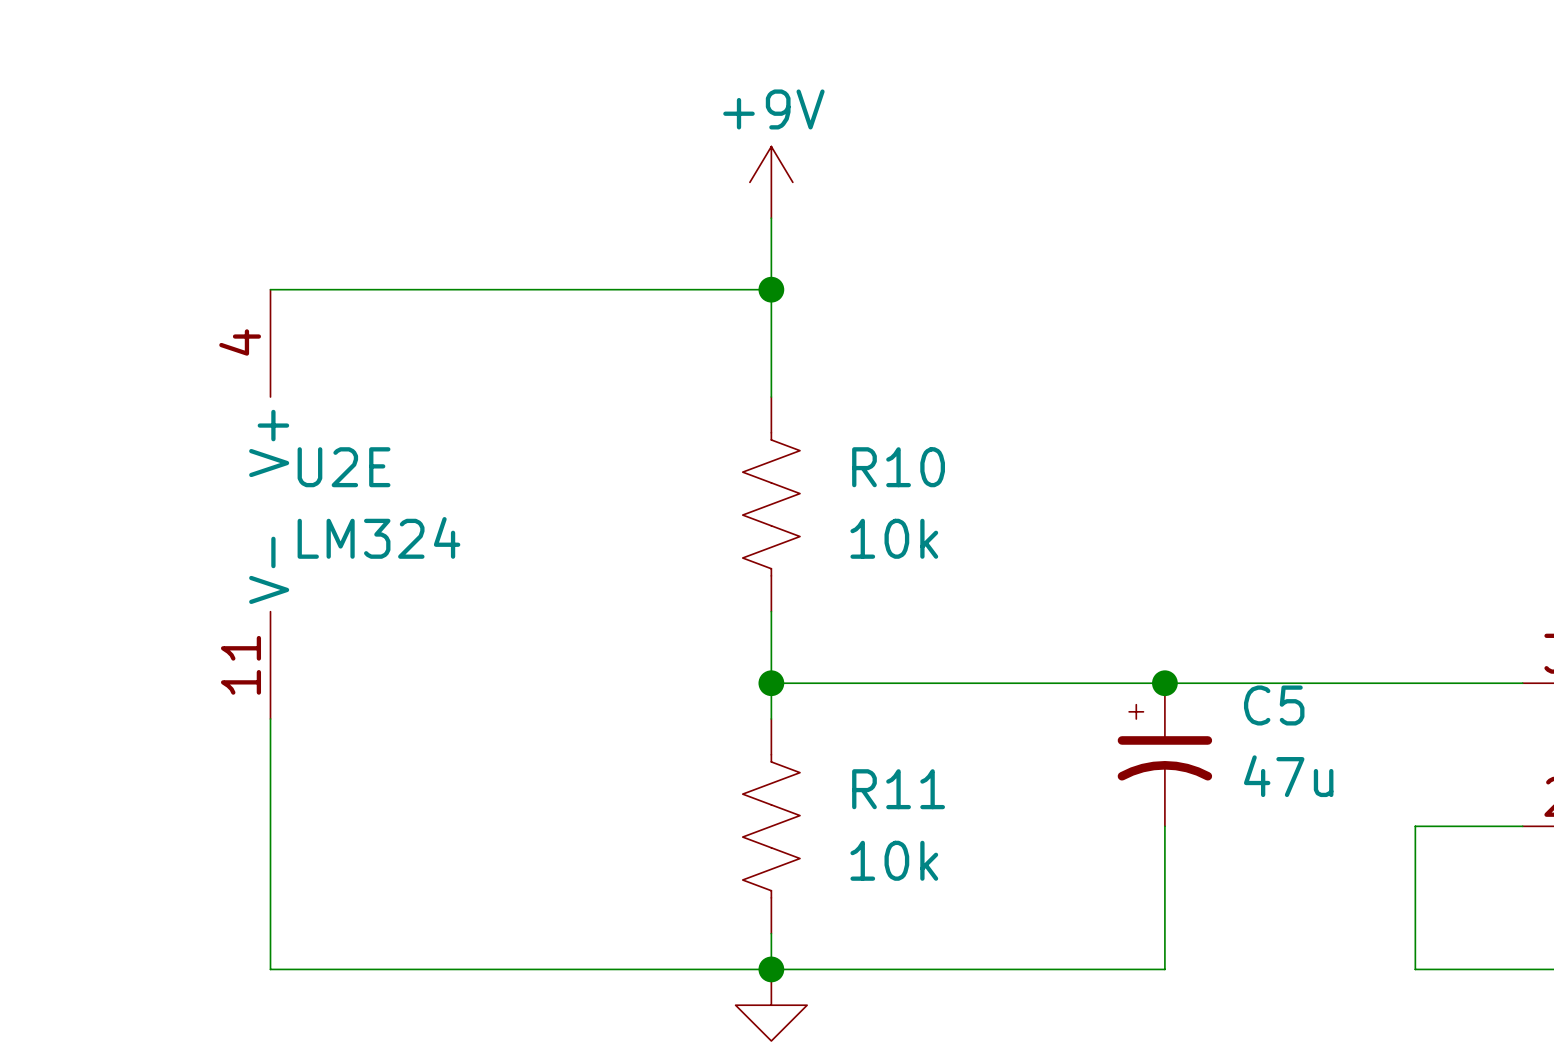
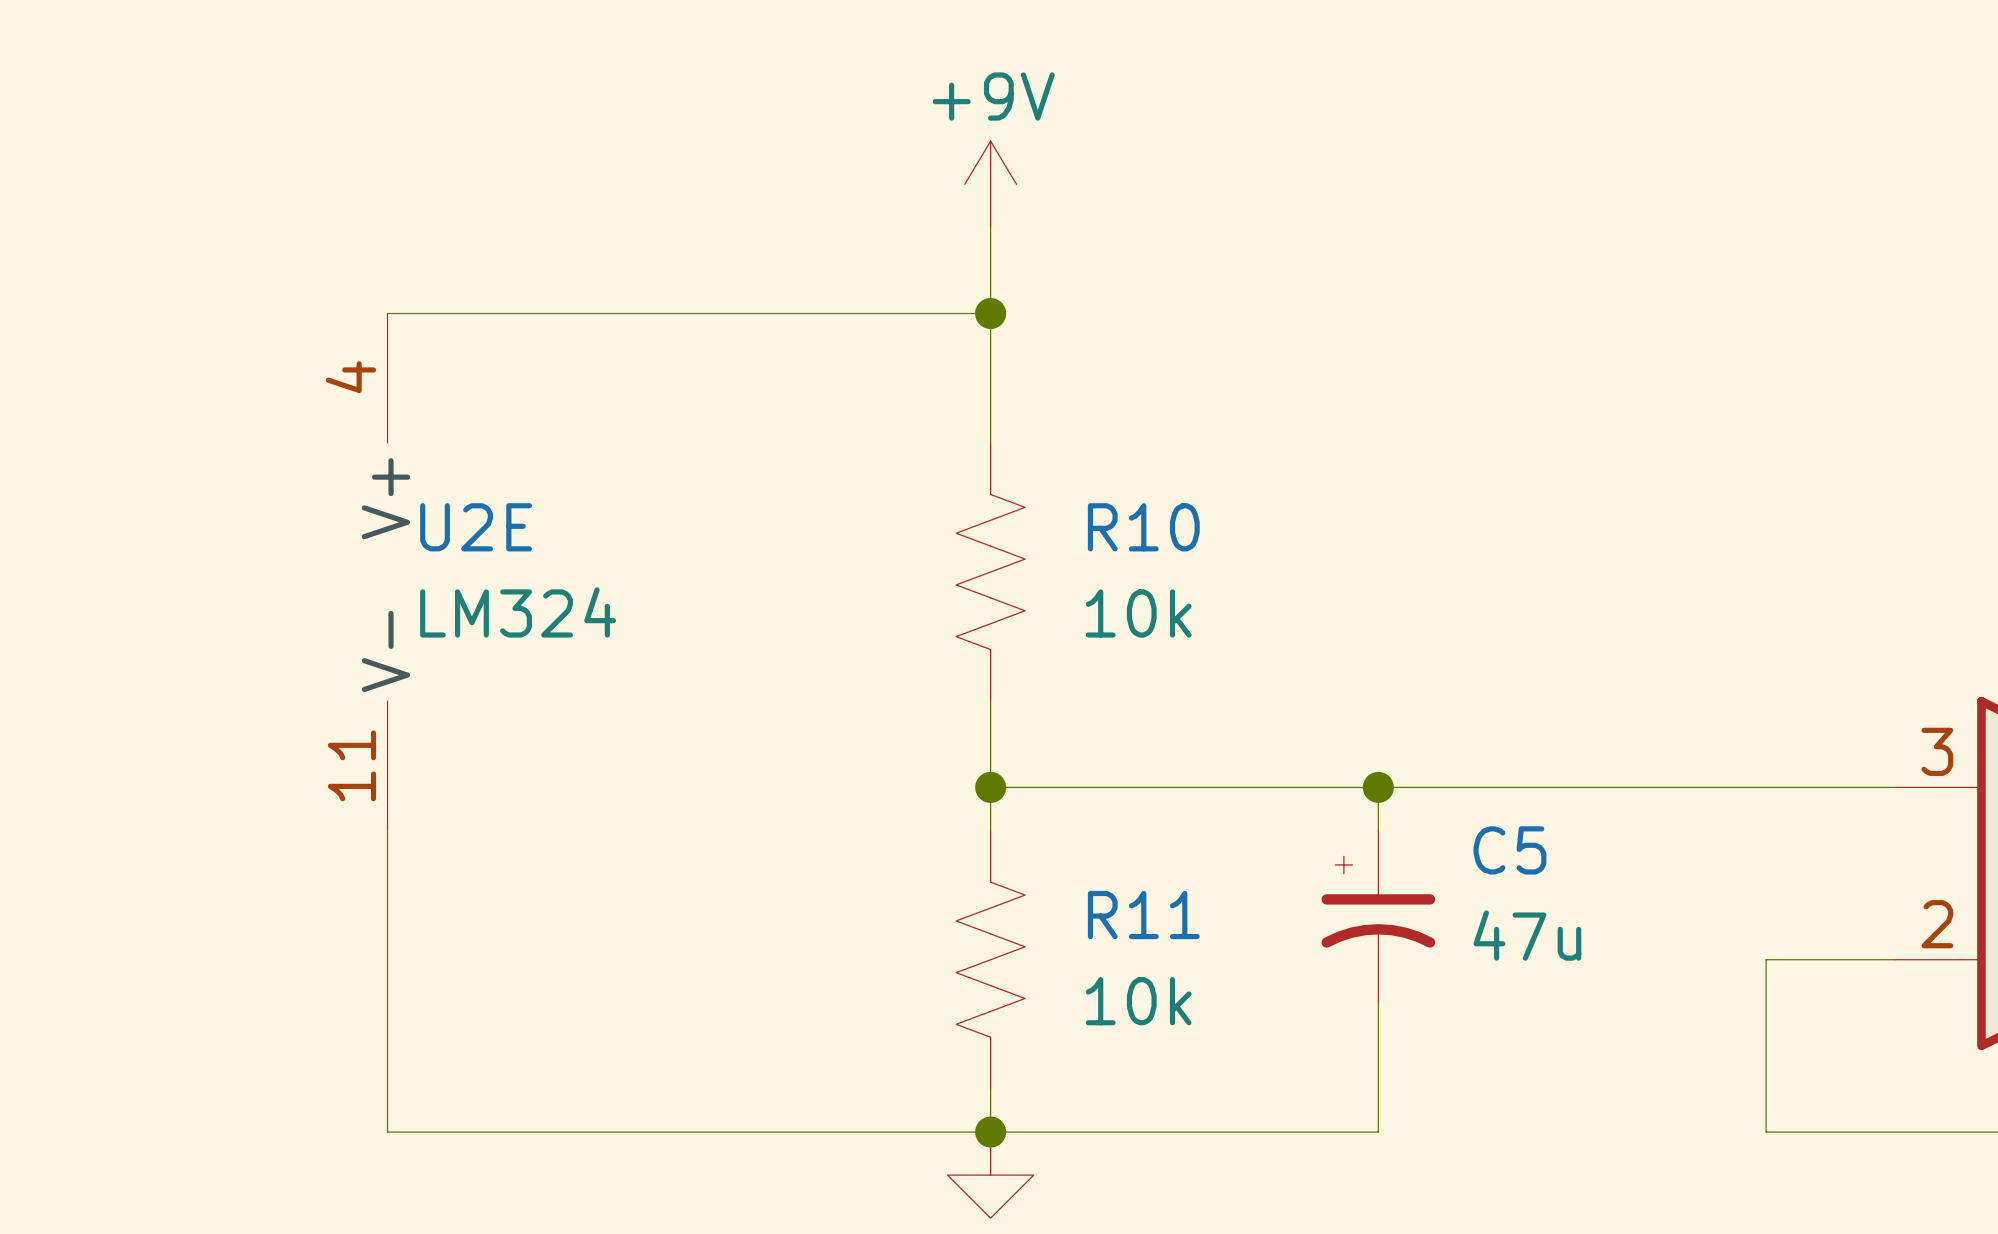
wire: none -> (1378, 787) (1378, 830)
junction position: (1164, 683) -> (1378, 787)
C5 name position: C5 (1274, 705) -> C5 (1509, 850)
C5 position: (1164, 754) -> (1378, 916)
C5 value position: 47u (1288, 776) -> 47u (1527, 935)
wire: (1164, 826) (1164, 969) (1093, 969) -> (1378, 1002) (1378, 1132)

